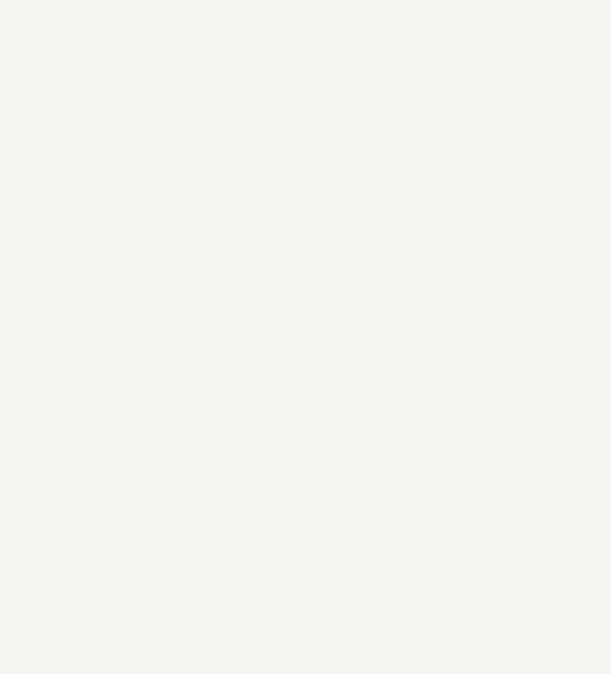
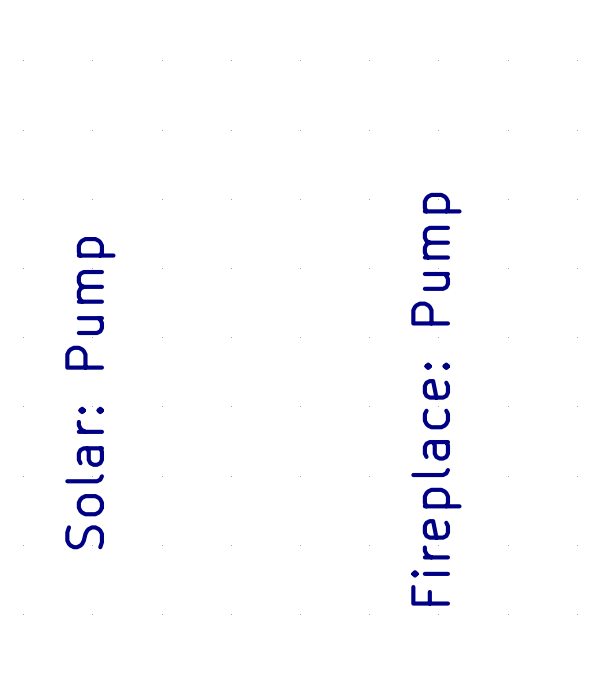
text: none -> Solar: Pump (90, 393)
text: none -> Fireplace: Pump (436, 399)

